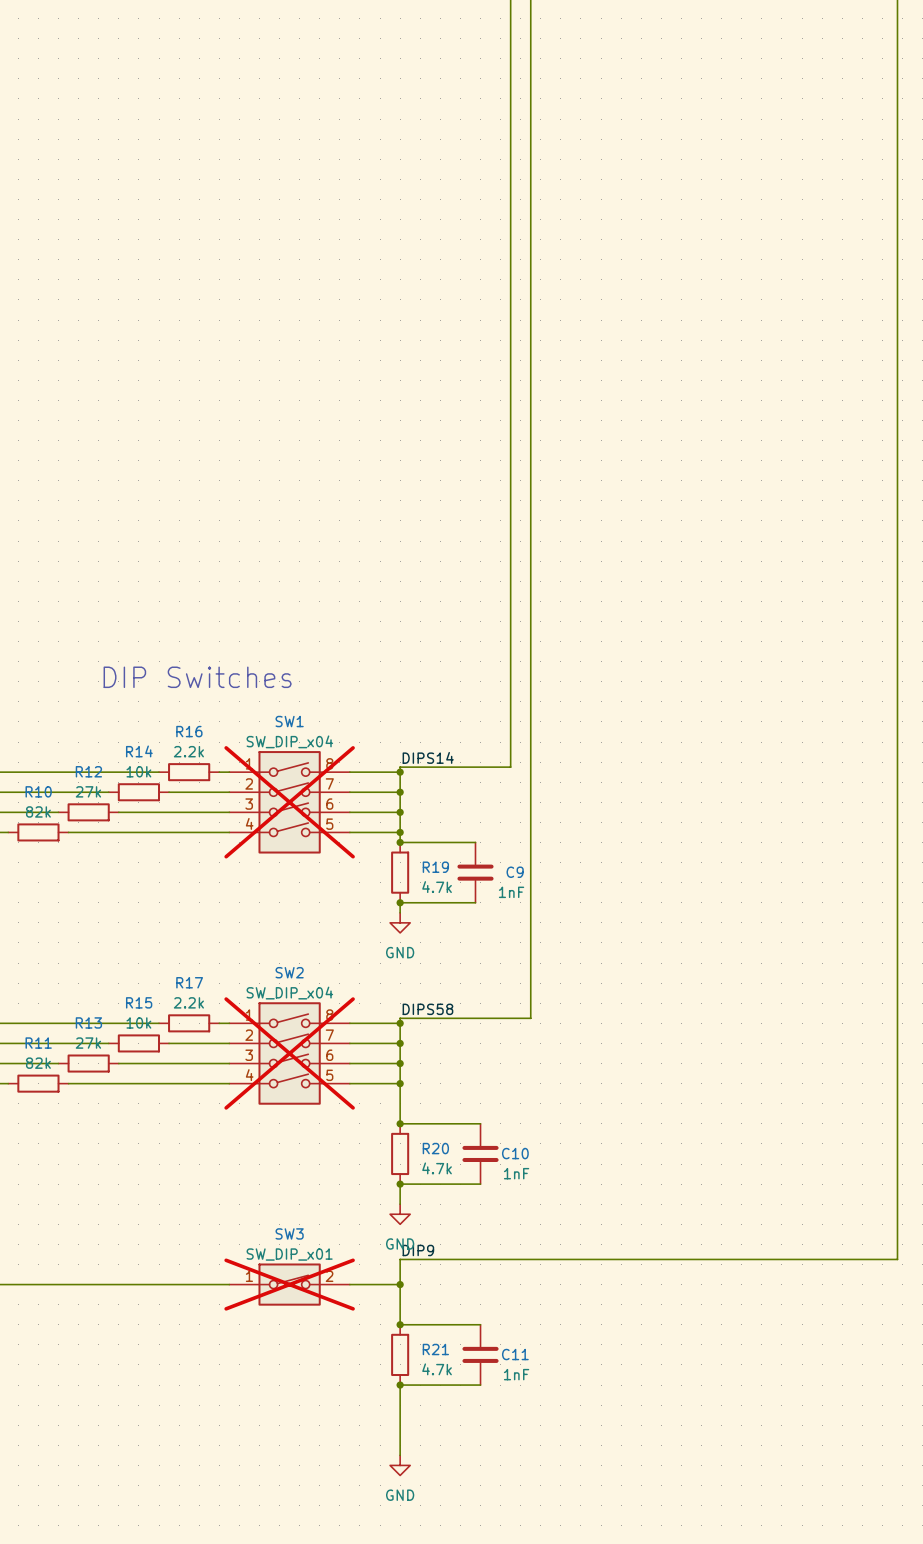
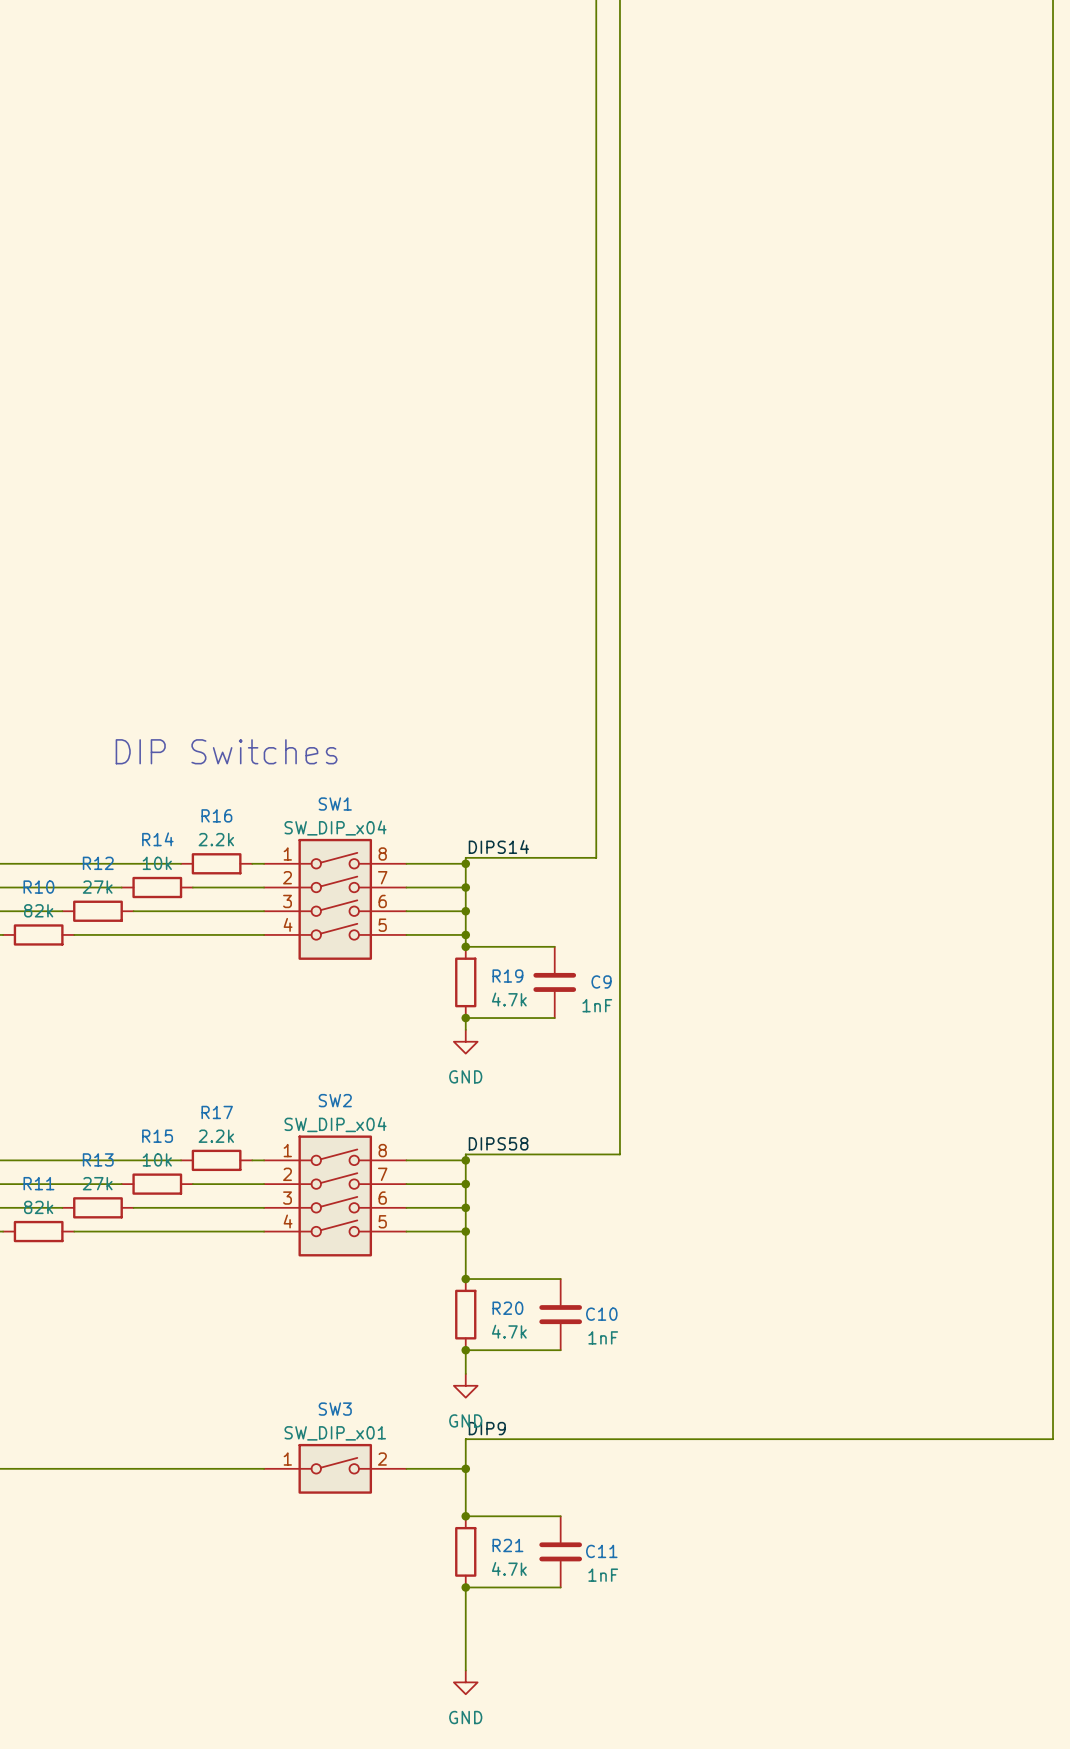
SW1 do-not-place cross: (289, 802) -> none
SW2 do-not-place cross: (289, 1053) -> none
SW3 do-not-place cross: (289, 1284) -> none

